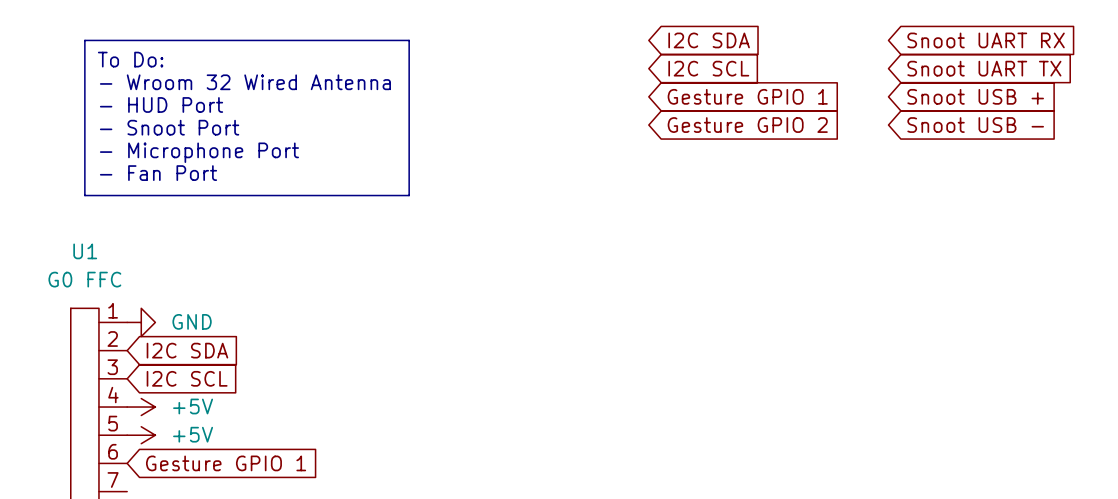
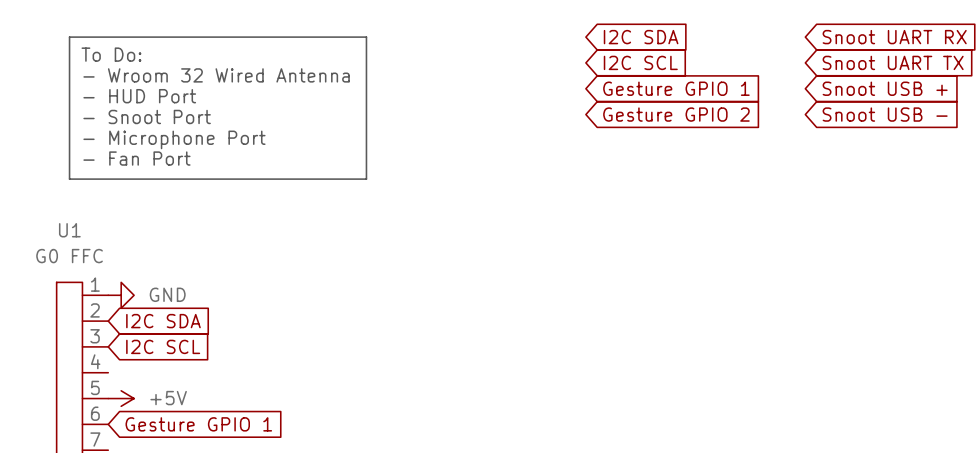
power symbol: +5V (141, 407) -> none

